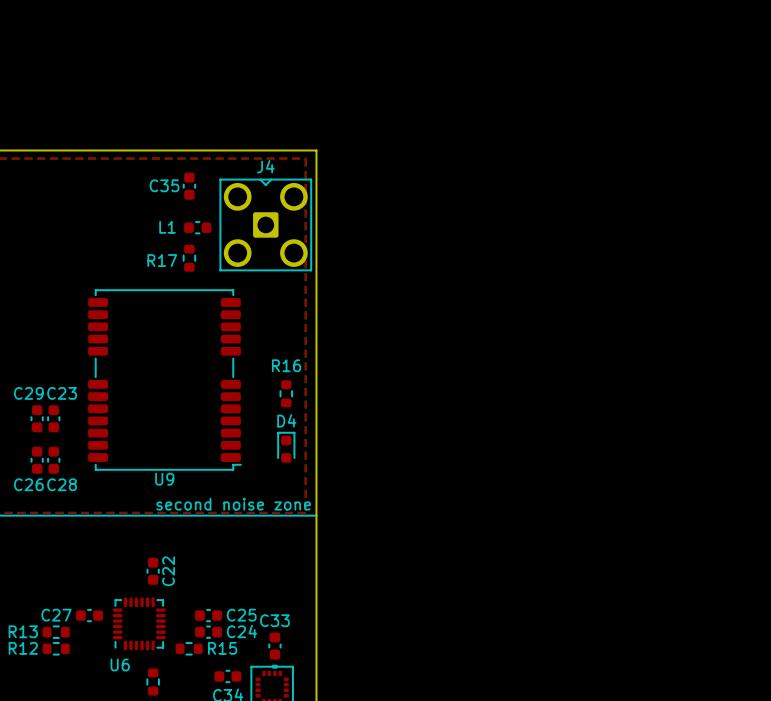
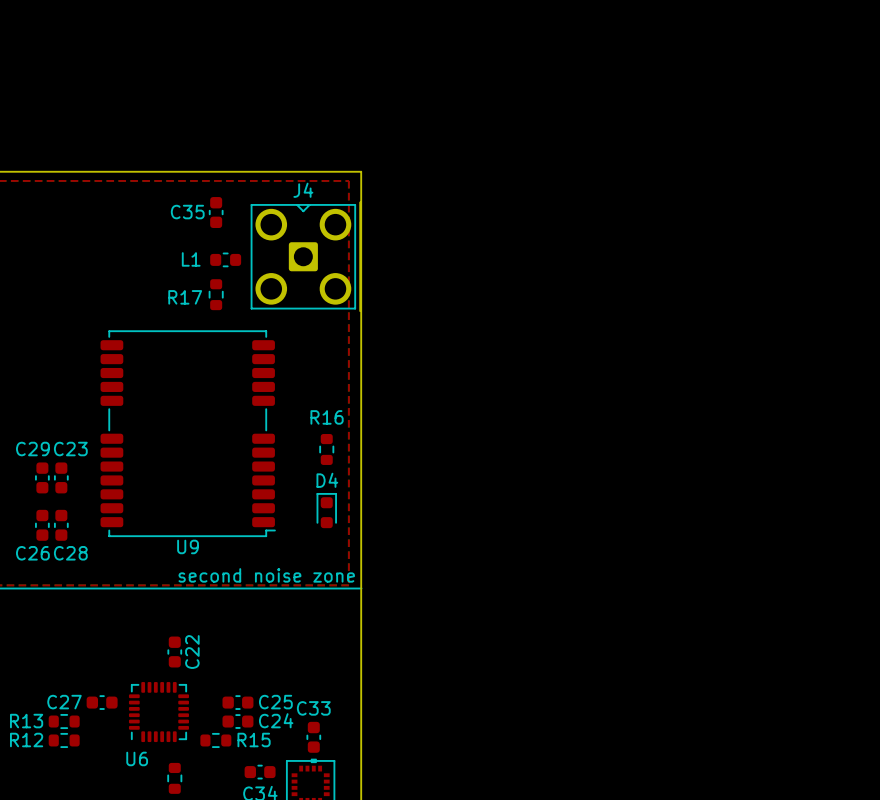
J4 footprint: [219, 178, 312, 272] -> [250, 201, 361, 312]

